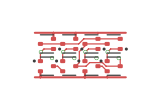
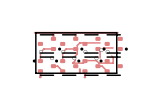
line: none -> (35, 32) (116, 32) (116, 73) (35, 73) (35, 32)
track: (117, 32) (125, 32) -> none
track: (120, 38) (83, 38) (78, 43) (40, 43) -> none
track: none -> (100, 42) (79, 42) (77, 45) (77, 54) (72, 63) (83, 63) (85, 60) (113, 63) (111, 56)
track: (107, 43) (84, 43) (79, 51) (79, 62) (75, 66) (86, 66) (89, 62) (102, 62) (106, 66) (120, 66) (118, 58) -> none
track: none -> (113, 47) (103, 47) (100, 51) (100, 58)
track: (97, 48) (88, 48) (84, 52) (84, 61) -> none
track: (120, 48) (110, 48) (107, 52) (107, 61) -> none
via position: (118, 58) -> (101, 49)
track: none -> (79, 69) (80, 73)
track: (34, 77) (125, 77) -> none

